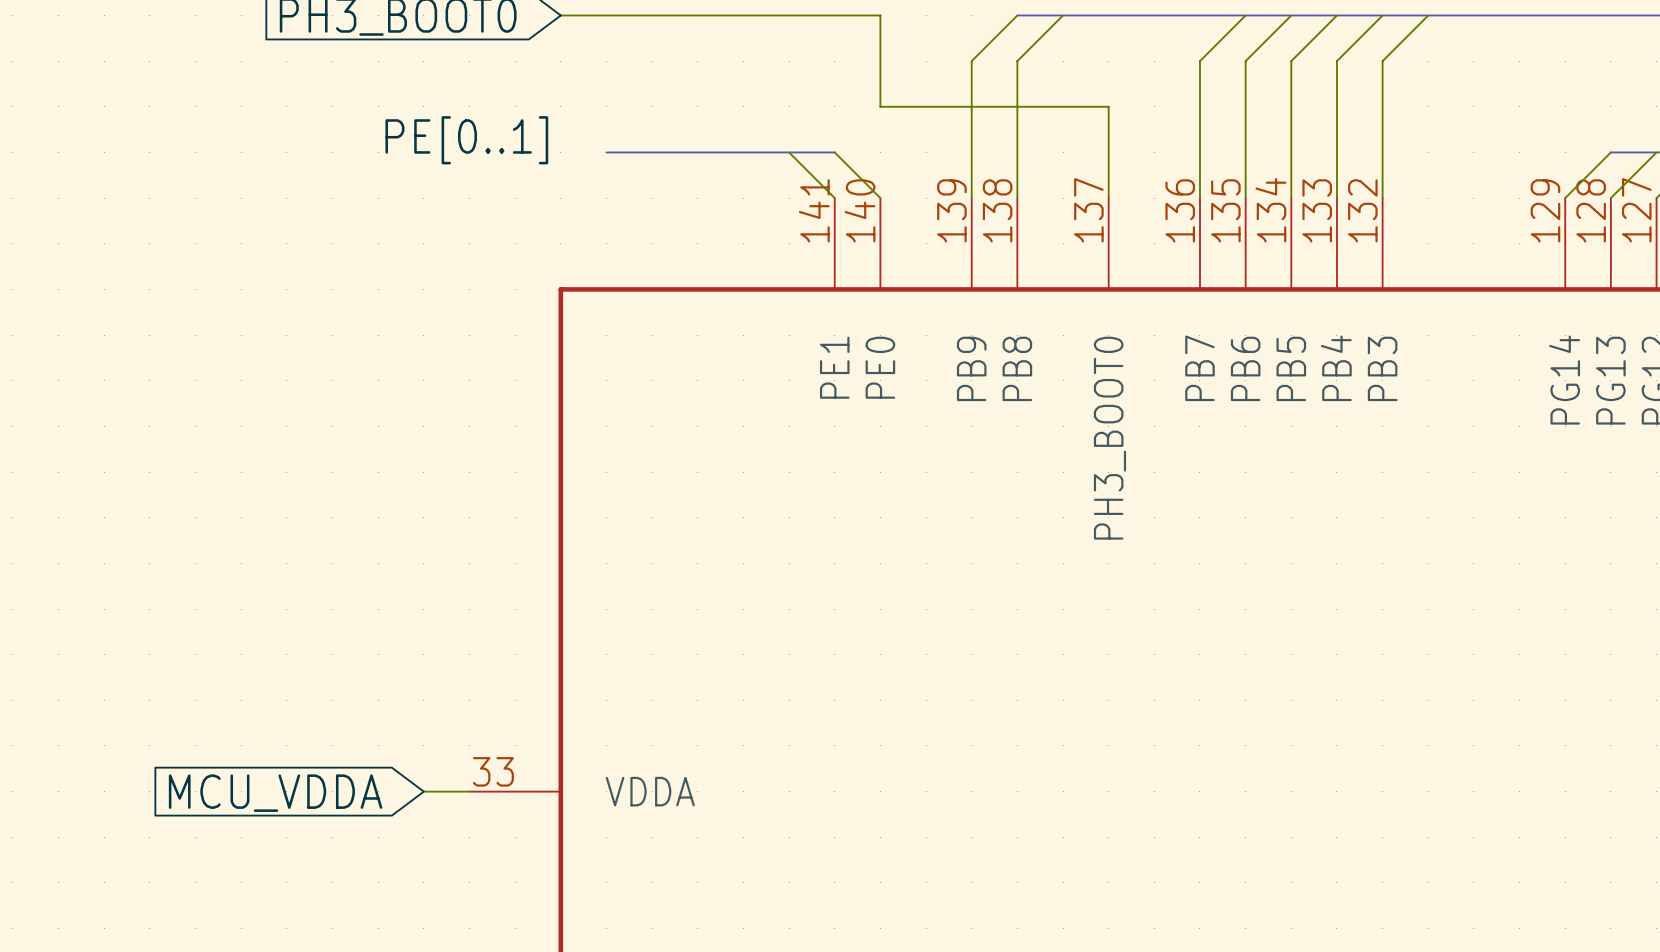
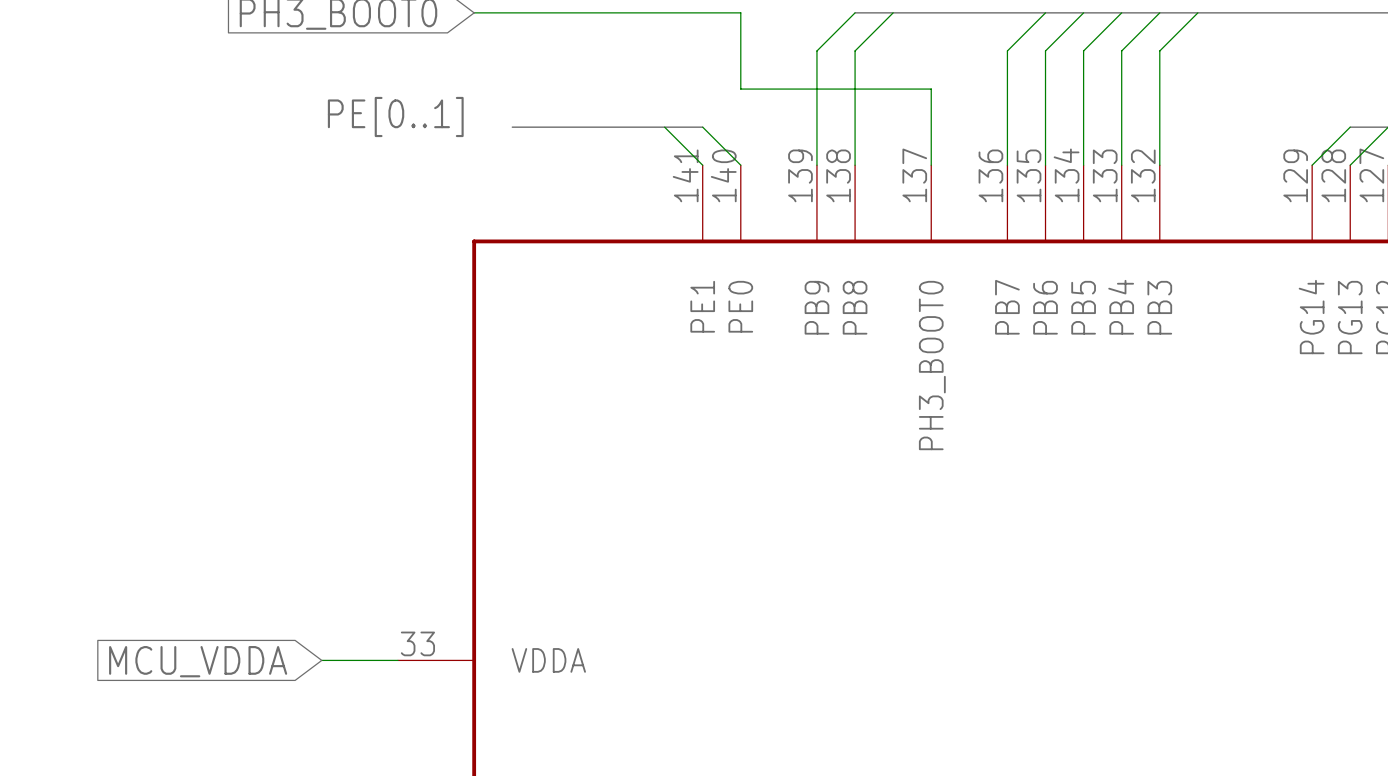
wire: none -> (321, 660) (359, 660)
global label position: MCU_VDDA (275, 793) -> MCU_VDDA (198, 661)

